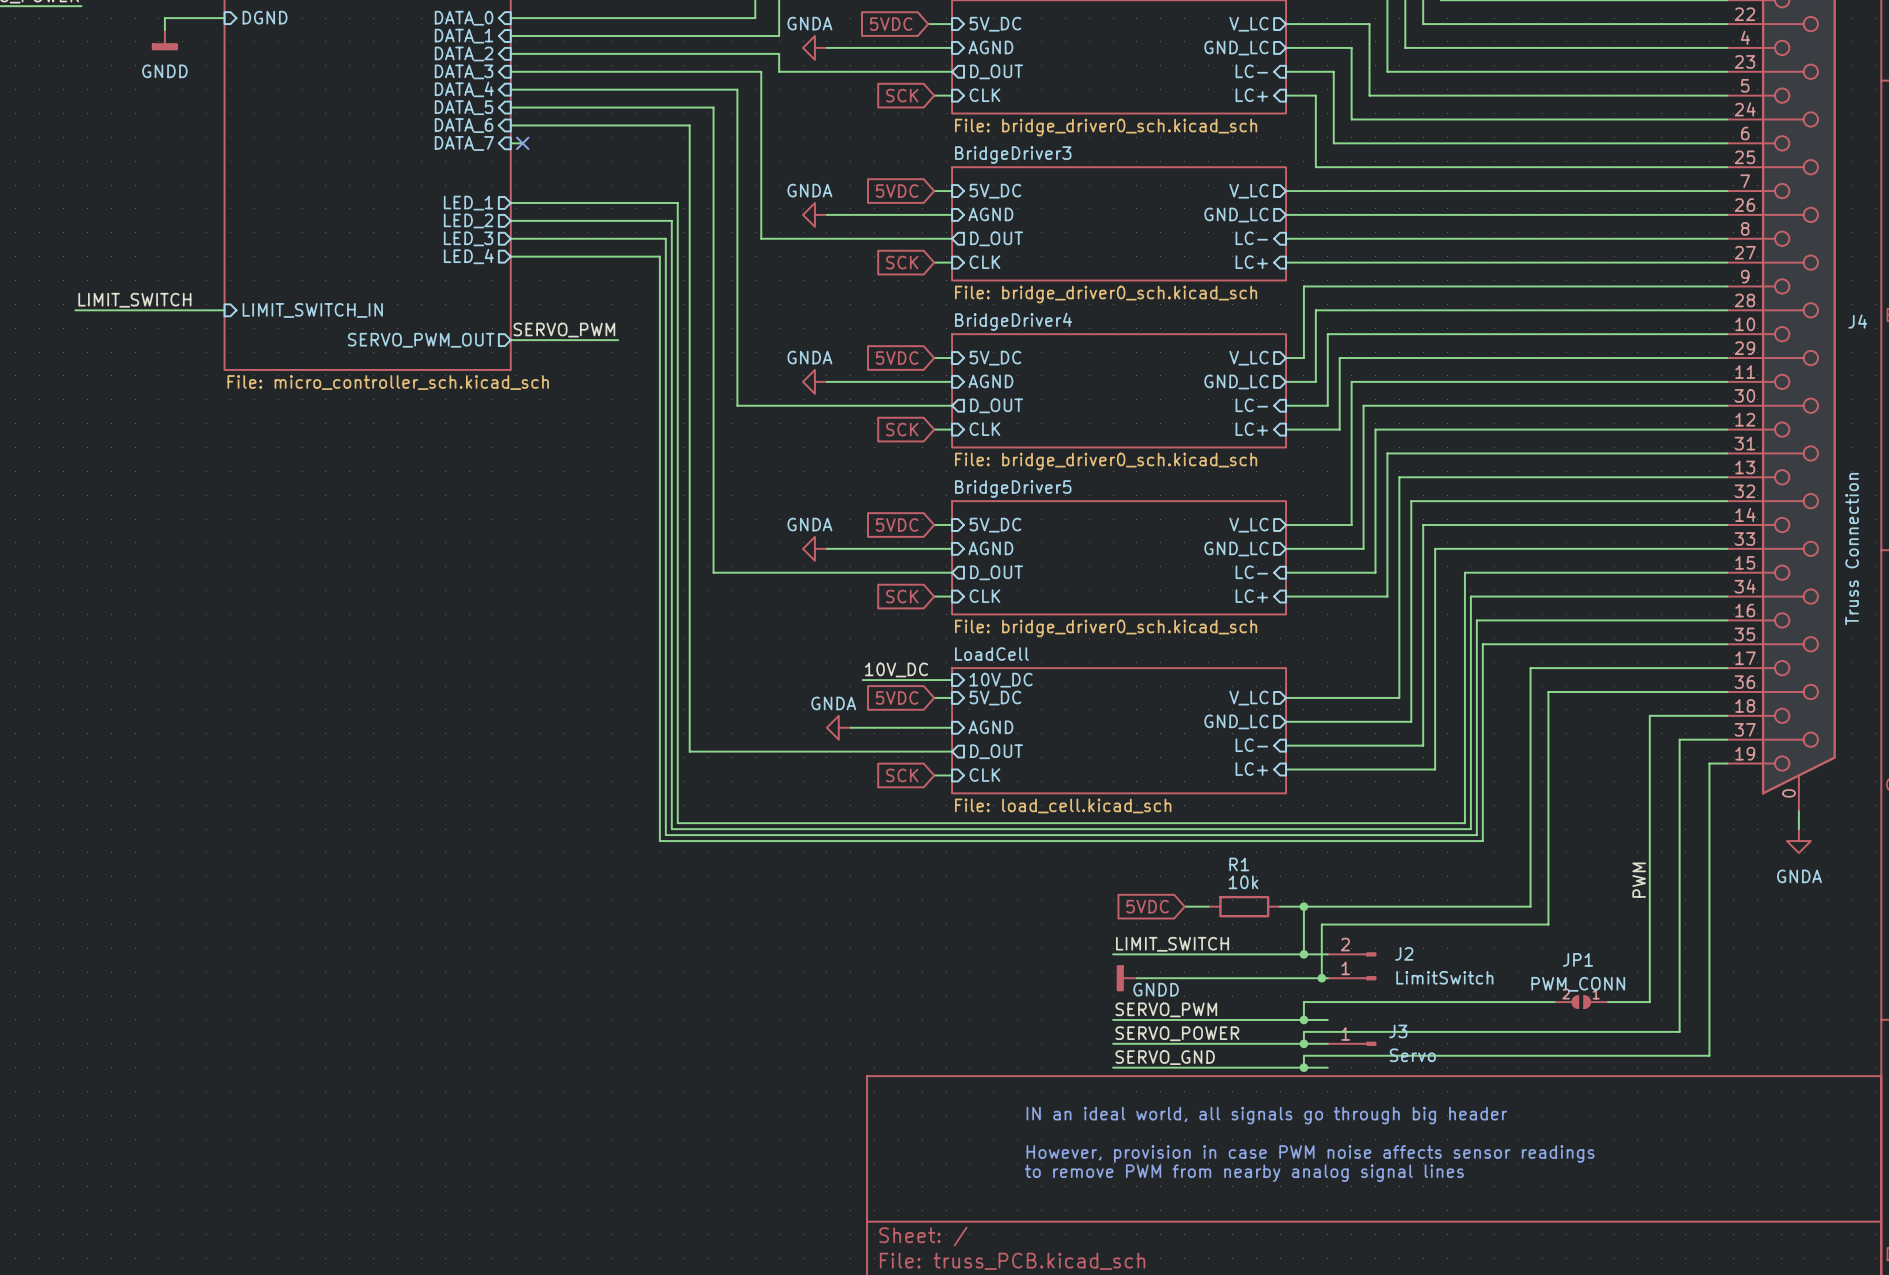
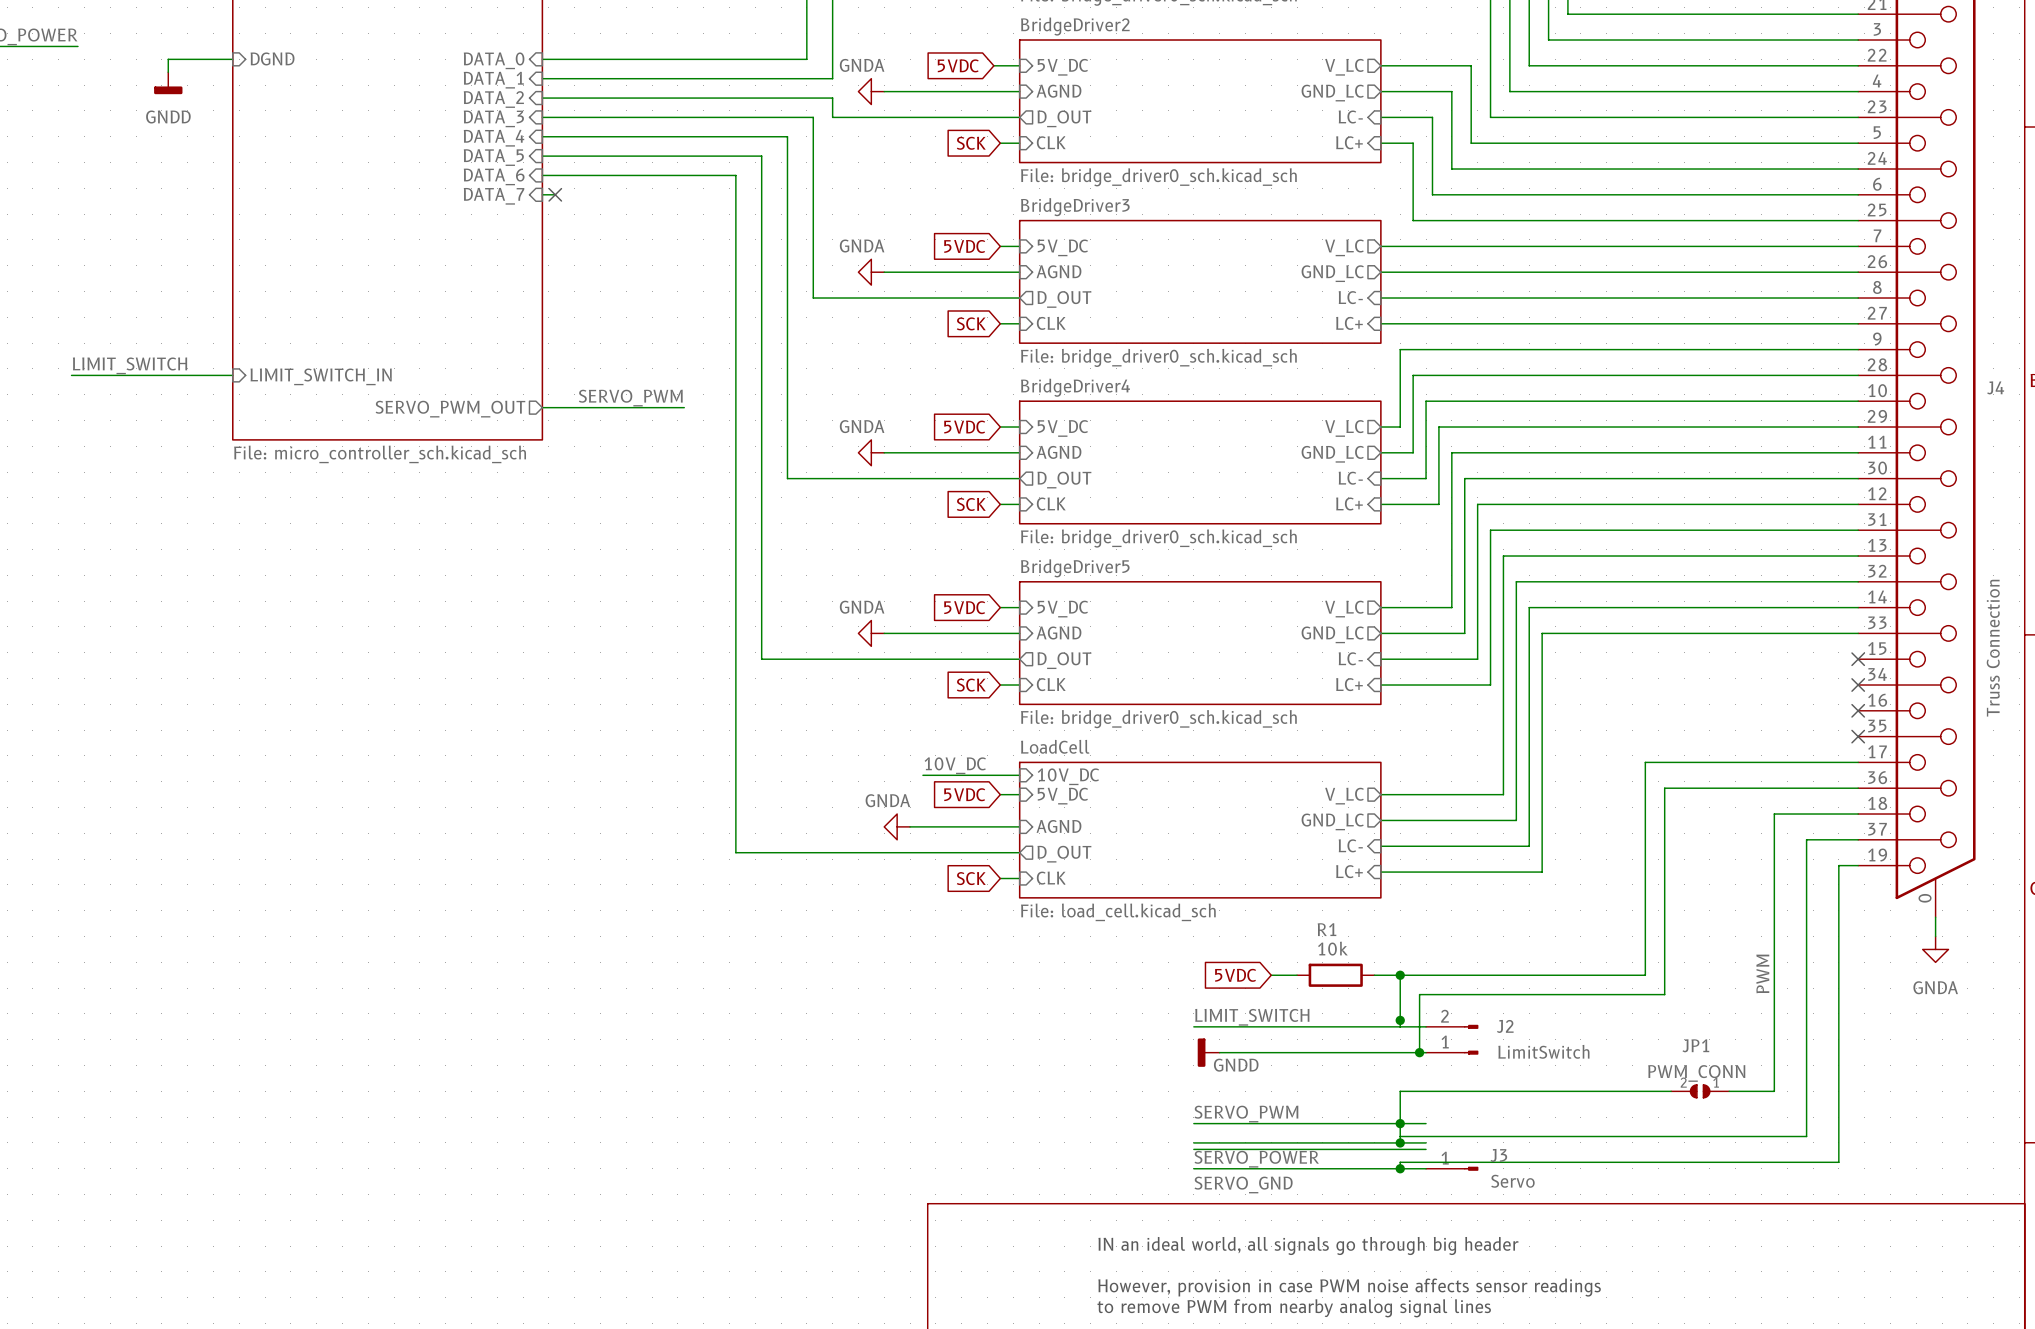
wire: (510, 202) (677, 202) (677, 823) (1464, 823) (1464, 572) (1727, 572) -> none
sheet pin: LED_1 (468, 203) -> none
sheet pin: LED_2 (468, 220) -> none
wire: (510, 220) (671, 220) (671, 829) (1470, 829) (1470, 596) (1727, 596) -> none
sheet pin: LED_3 (468, 238) -> none
wire: (510, 238) (665, 238) (665, 835) (1476, 835) (1476, 620) (1727, 620) -> none
sheet pin: LED_4 (468, 256) -> none
wire: (510, 256) (659, 256) (659, 841) (1482, 841) (1482, 644) (1727, 644) -> none
label position: SERVO_PWM (564, 330) -> SERVO_PWM (630, 398)
wire: none -> (658, 407) (684, 407)
no-connect mark: none -> (1858, 659)
no-connect mark: none -> (1858, 685)
no-connect mark: none -> (1858, 710)
no-connect mark: none -> (1858, 736)
junction: none -> (1400, 975)
wire: (1530, 864) (1530, 906) (1280, 906) -> (1645, 975) (1374, 975)
label position: PWM (1639, 880) -> PWM (1762, 973)
wire: (1548, 882) (1548, 924) (1321, 924) -> (1664, 994) (1419, 994) (1419, 1039)
global label position: 5VDC (1147, 906) -> 5VDC (1235, 975)
wire: (1184, 906) (1208, 906) -> (1271, 975) (1297, 975)
R1 position: (1244, 906) -> (1335, 975)
wire: (1303, 912) (1303, 954) -> (1400, 975) (1400, 1020)
wire: (1321, 936) (1321, 978) -> none
junction: none -> (1419, 1052)
label position: LIMIT_SWITCH (1172, 944) -> LIMIT_SWITCH (1252, 1017)
wire: (1113, 954) (1327, 954) -> (1193, 1026) (1426, 1026)
junction: (1303, 954) -> none
J2 position: (1351, 966) -> (1452, 1039)
wire: none -> (1671, 1091) (1400, 1091) (1400, 1123) (1193, 1123)
wire: (1649, 972) (1649, 1002) (1608, 1002) -> (1774, 1091) (1729, 1091)
power symbol position: GNDD (1126, 978) -> GNDD (1208, 1052)
wire: (1136, 978) (1327, 978) -> (1219, 1052) (1426, 1052)
junction: (1321, 978) -> none
junction: none -> (1400, 1123)
wire: (1327, 1002) (1554, 1002) -> none
JP1 position: (1581, 1002) -> (1700, 1091)
label position: SERVO_PWM (1166, 1009) -> SERVO_PWM (1246, 1114)
wire: (1679, 1014) (1679, 1031) (1303, 1031) (1303, 1037) -> (1806, 1136) (1400, 1136)
wire: (1709, 1037) (1709, 1055) (1303, 1055) (1303, 1067) -> (1838, 1162) (1400, 1162)
wire: (1113, 1067) (1327, 1067) -> (1193, 1149) (1426, 1149)
junction: (1303, 1067) -> none

